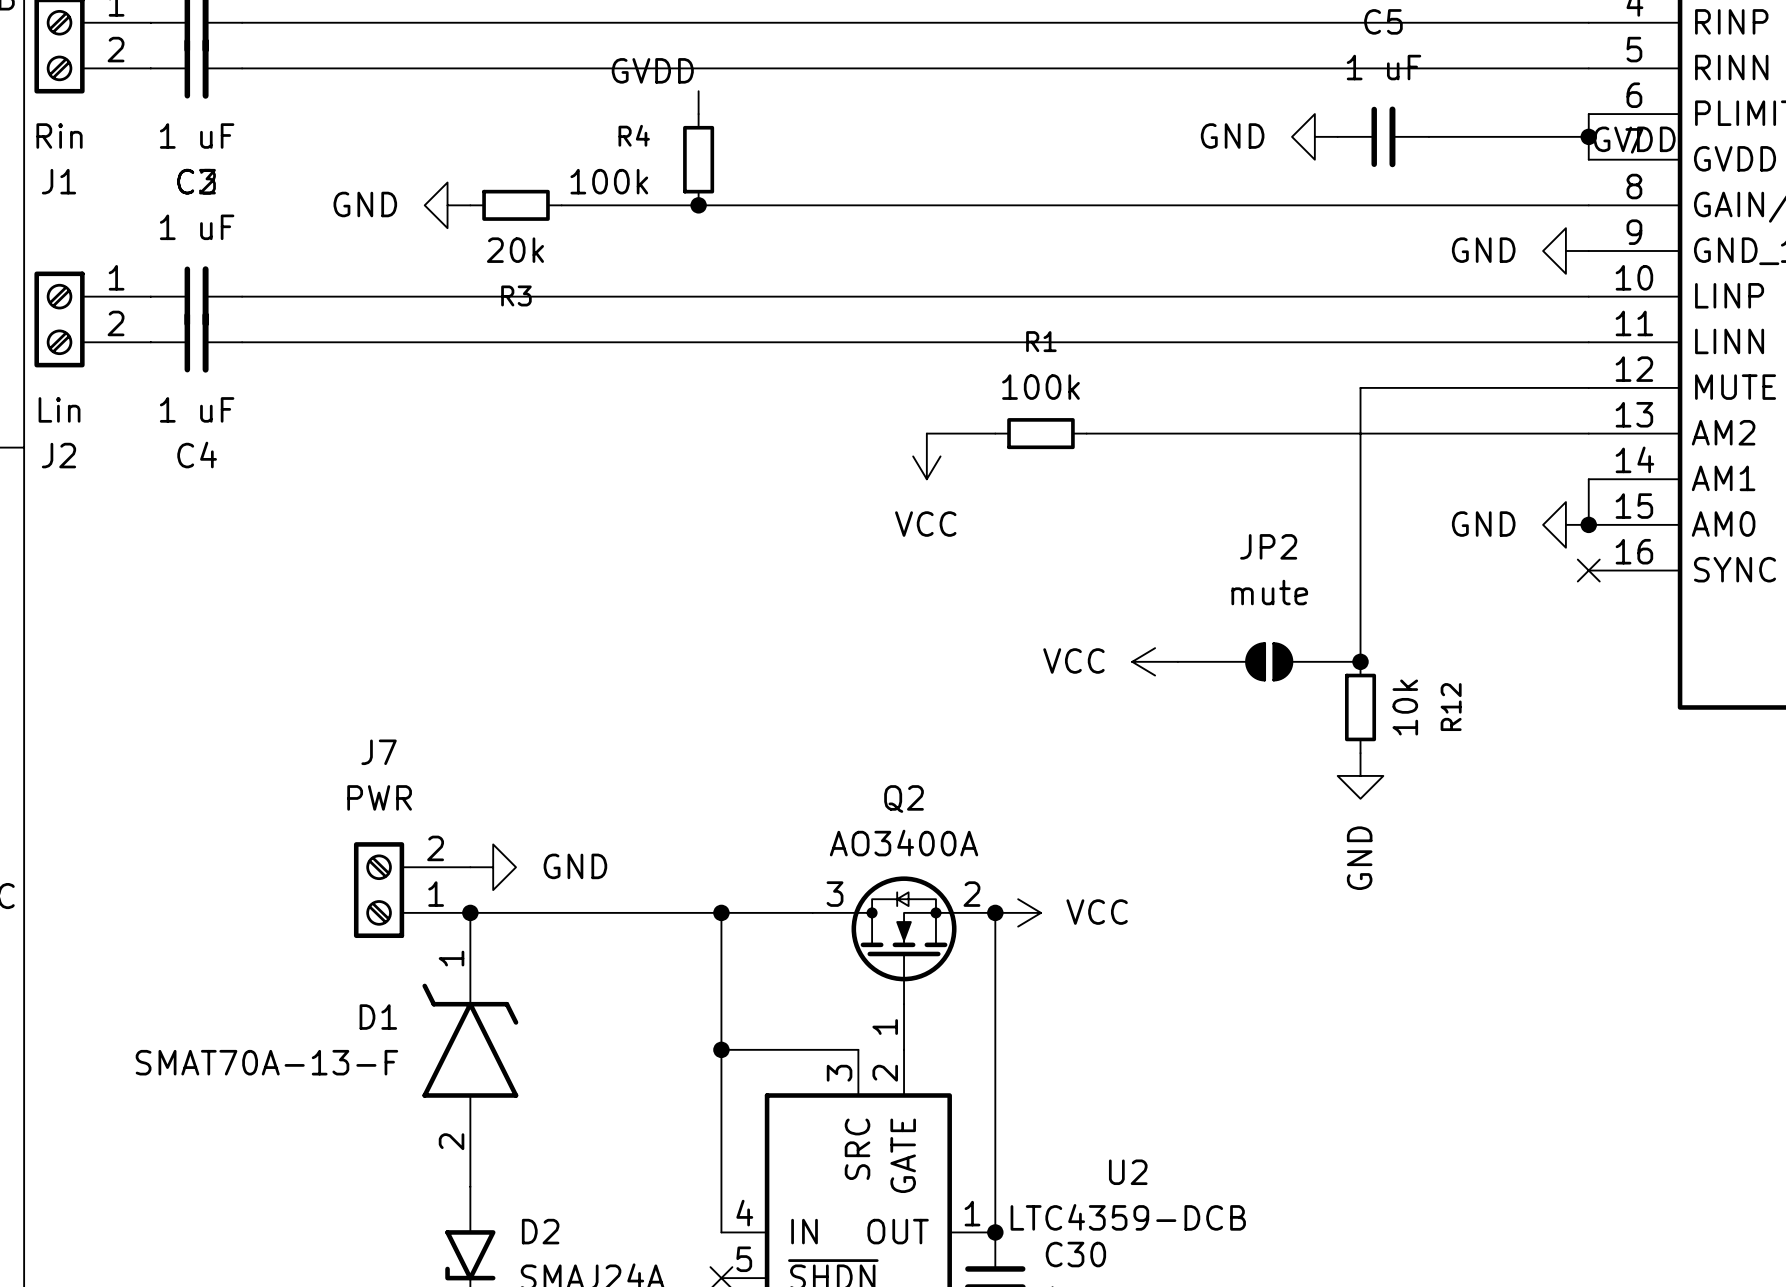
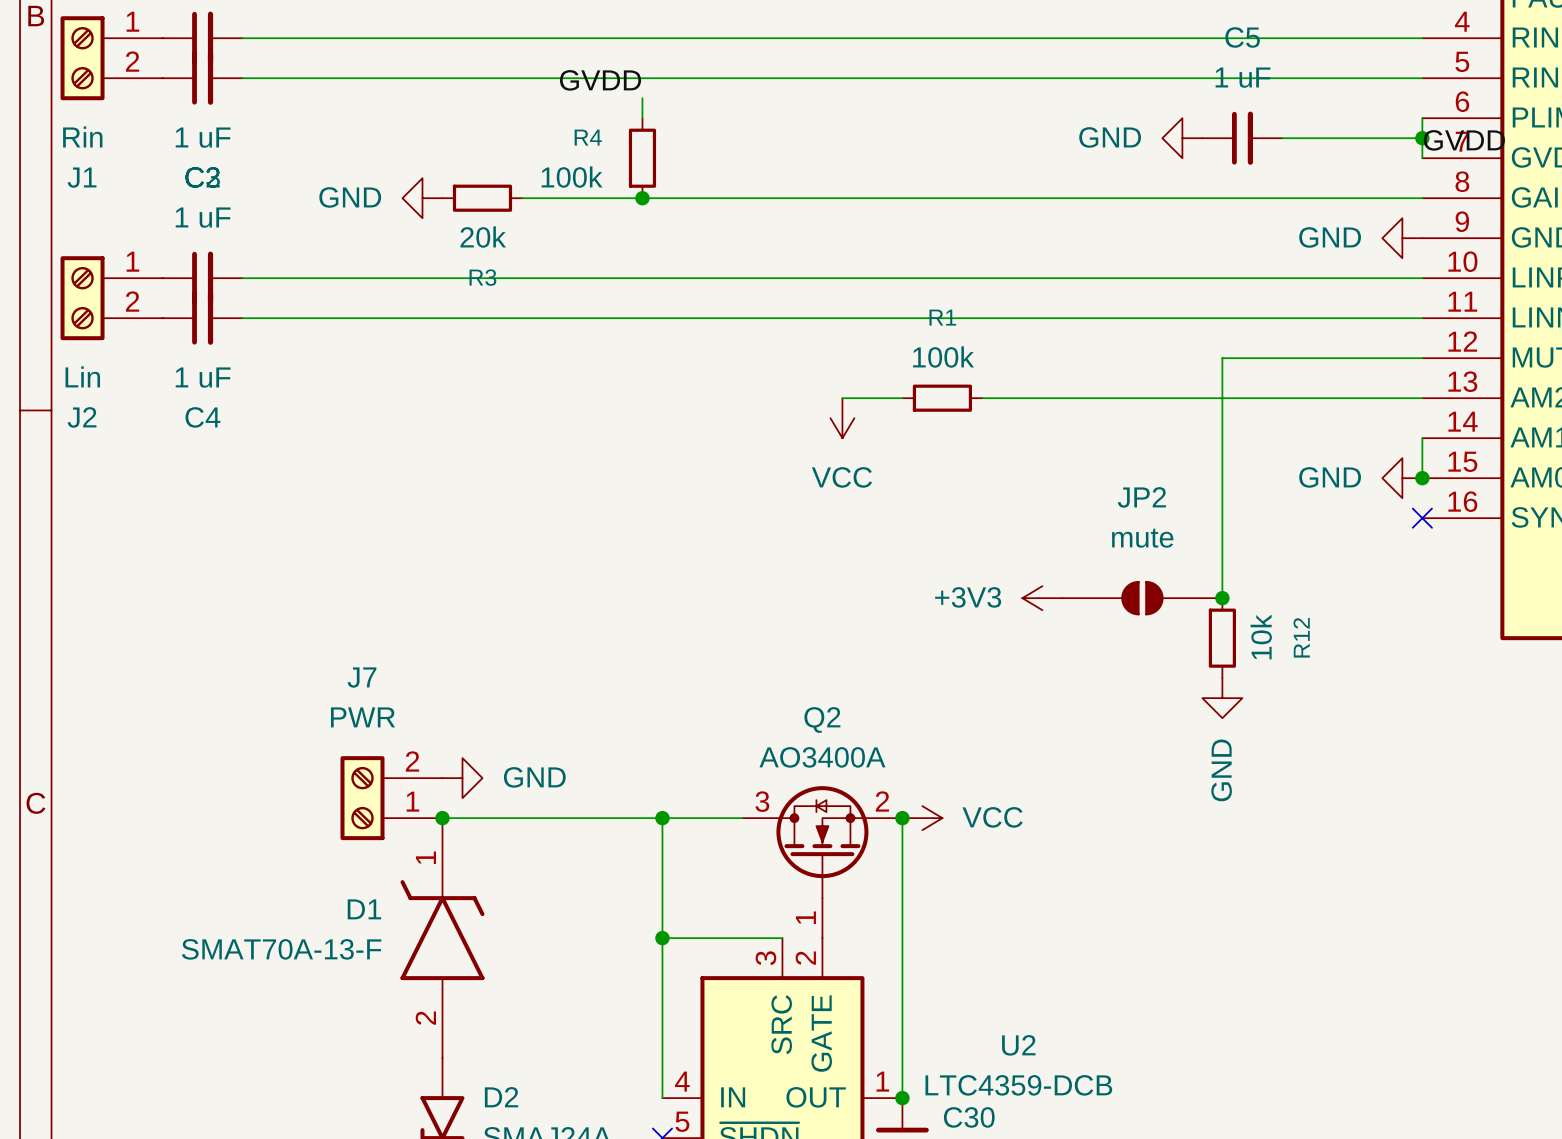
power symbol: VCC (1155, 661) -> +3V3 (1042, 598)

